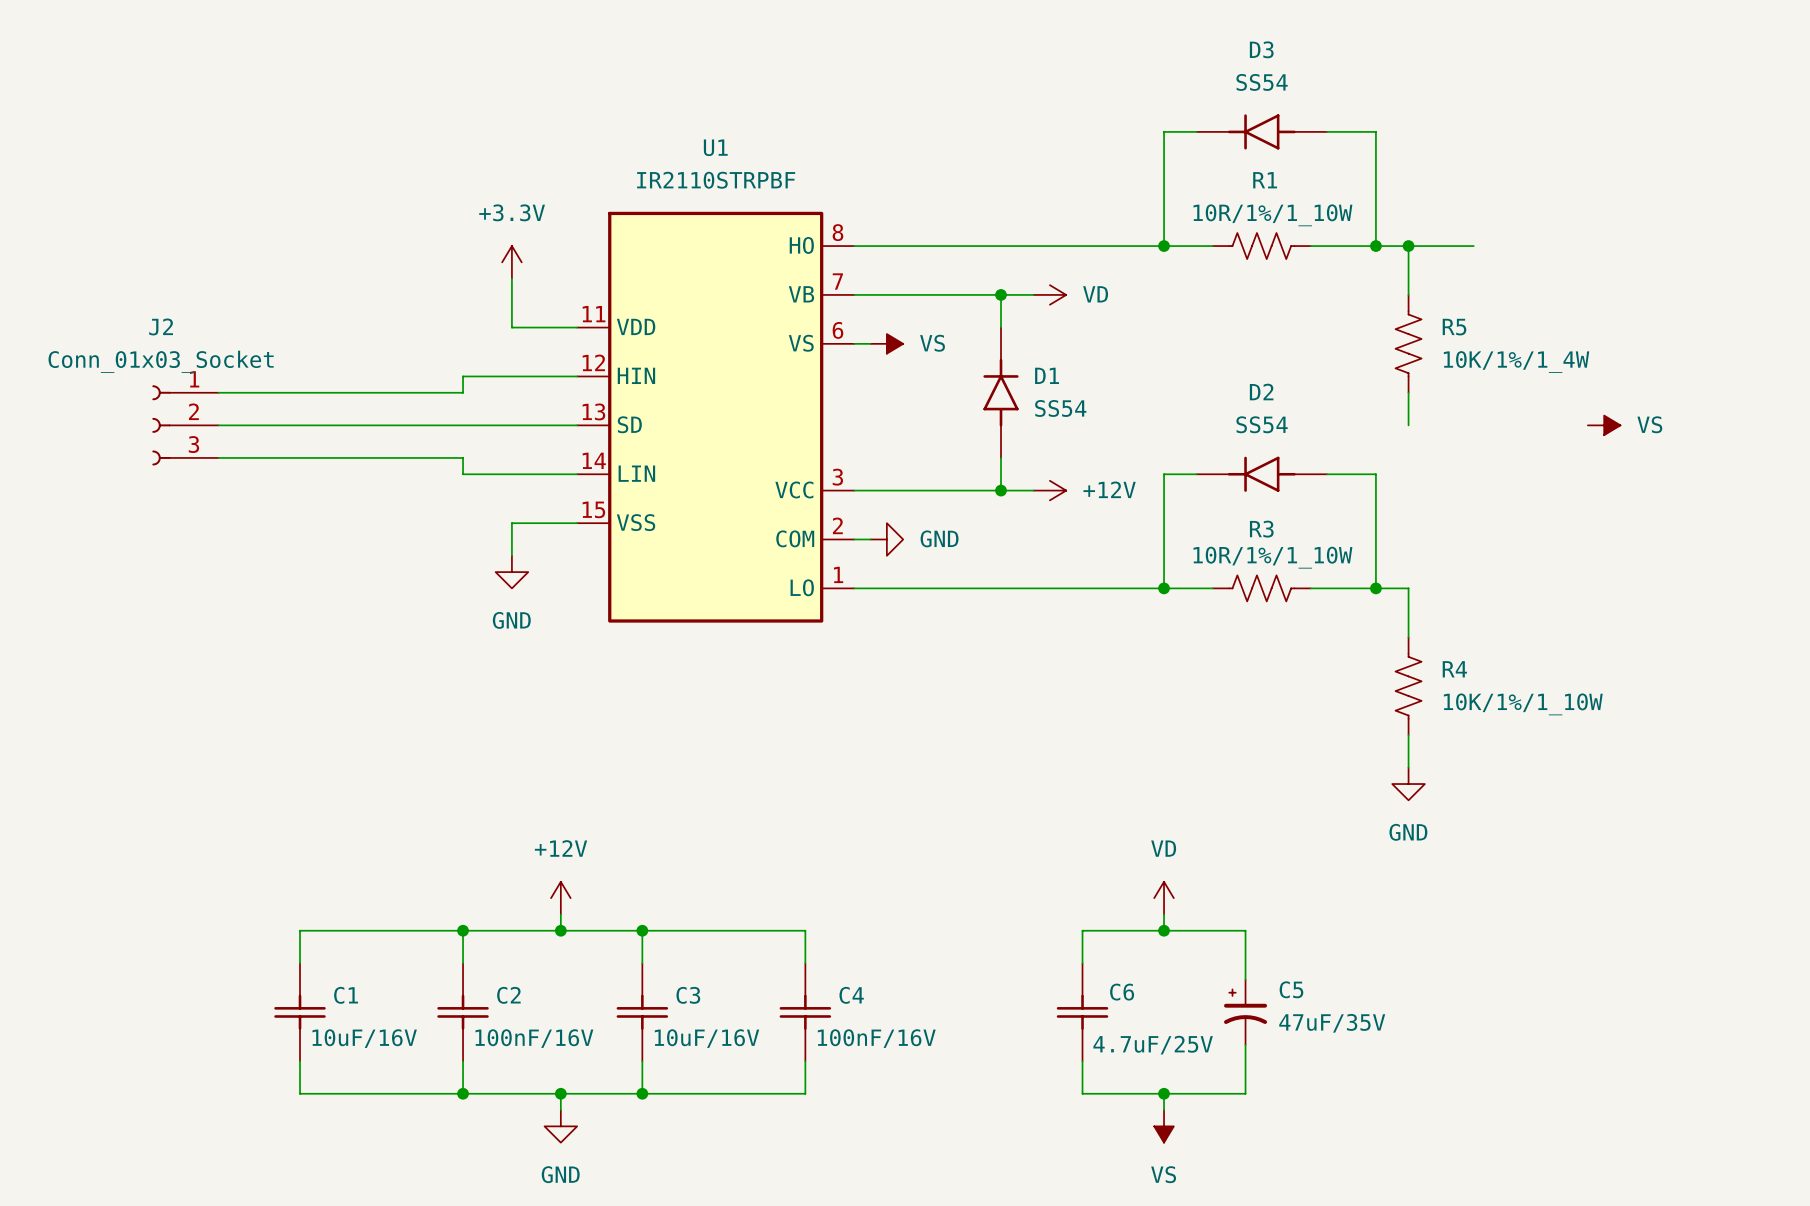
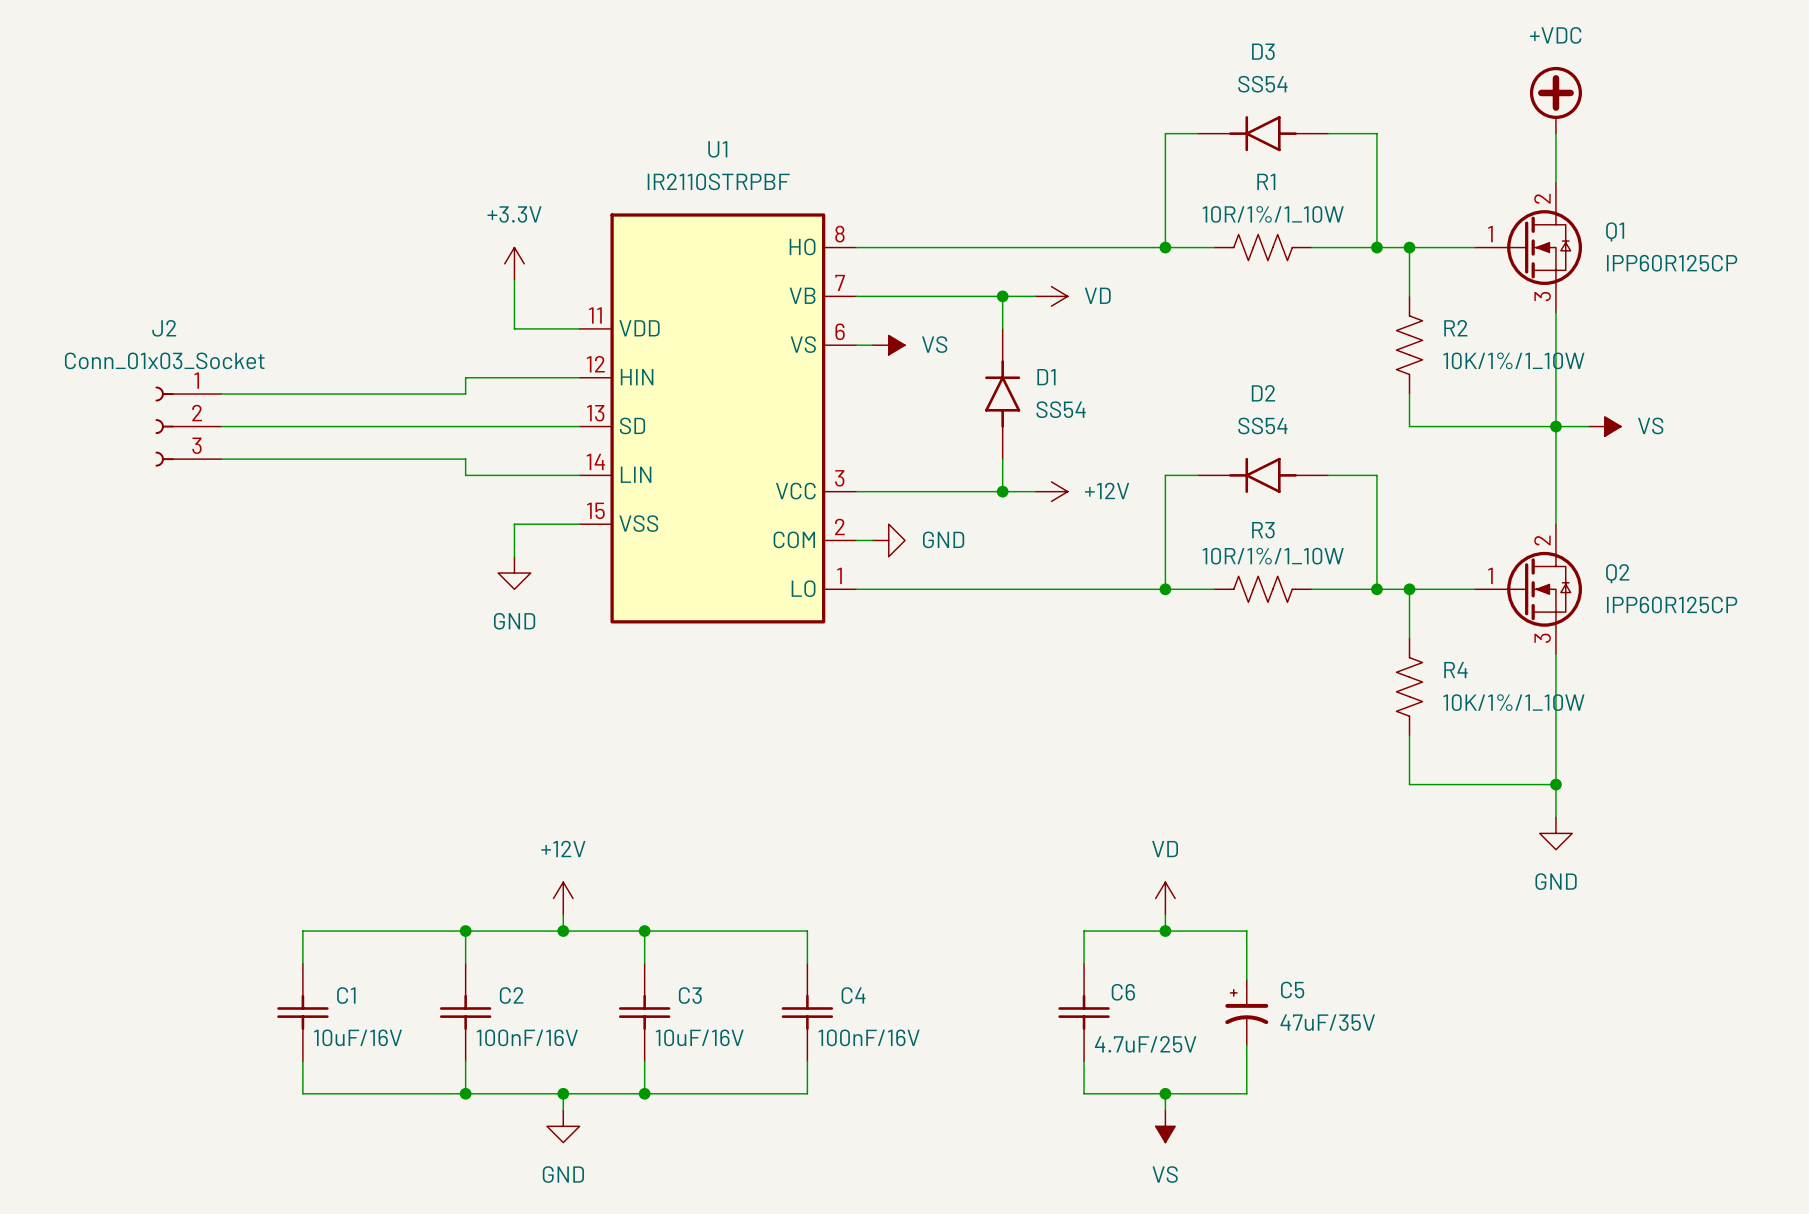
power symbol: none -> +VDC (1555, 100)
wire: none -> (1555, 133) (1555, 182)
Q1: none -> IPP60R125CP (1528, 247)
wire: none -> (1555, 312) (1555, 524)
R5 name: R5 (1454, 327) -> R2 (1455, 328)
R5 value: 10K/1%/1_4W (1516, 362) -> 10K/1%/1_10W (1513, 360)
wire: none -> (1409, 426) (1588, 426)
junction: none -> (1555, 426)
wire: none -> (1409, 589) (1474, 589)
junction: none -> (1409, 589)
Q2: none -> IPP60R125CP (1528, 589)
wire: none -> (1555, 654) (1555, 817)
wire: none -> (1409, 768) (1409, 784) (1555, 784)
power symbol position: GND (1408, 784) -> GND (1555, 833)
junction: none -> (1555, 784)

